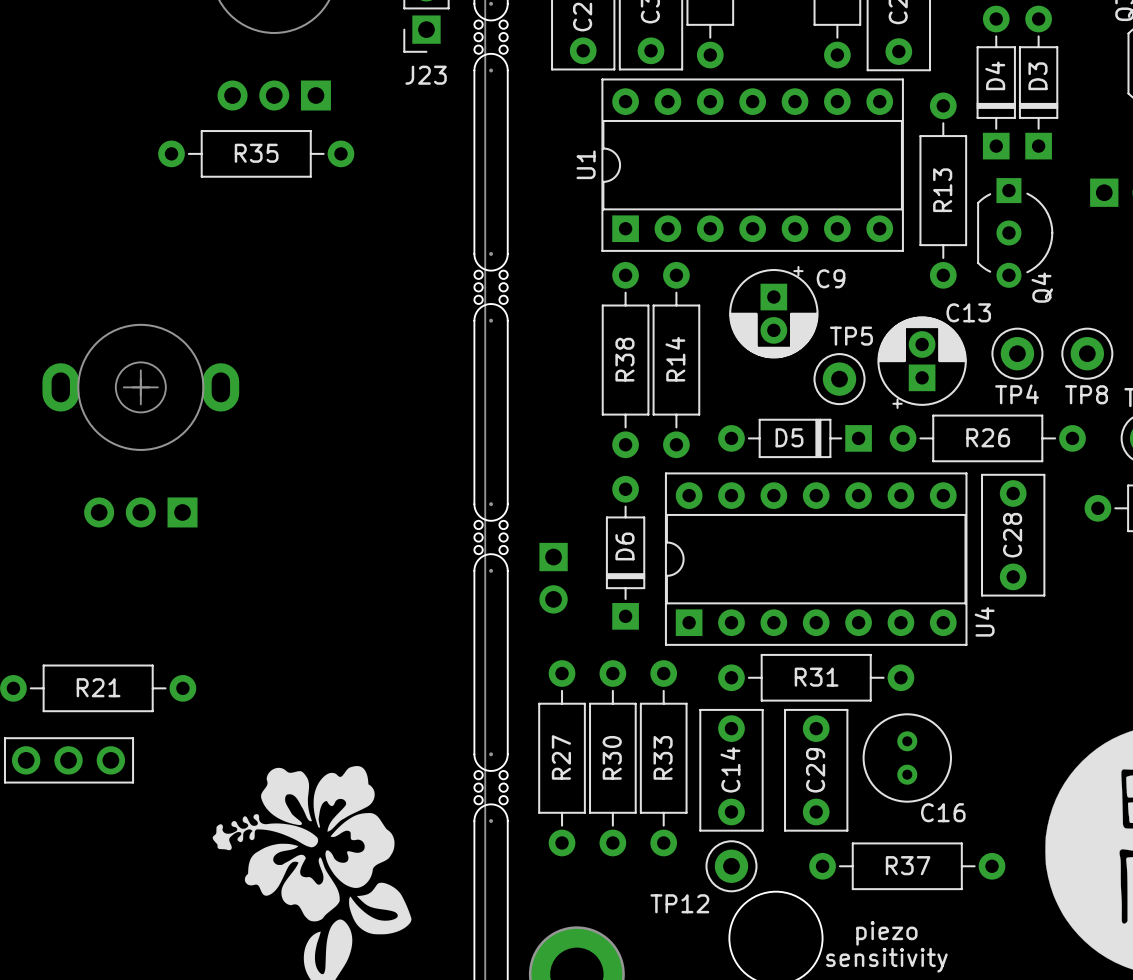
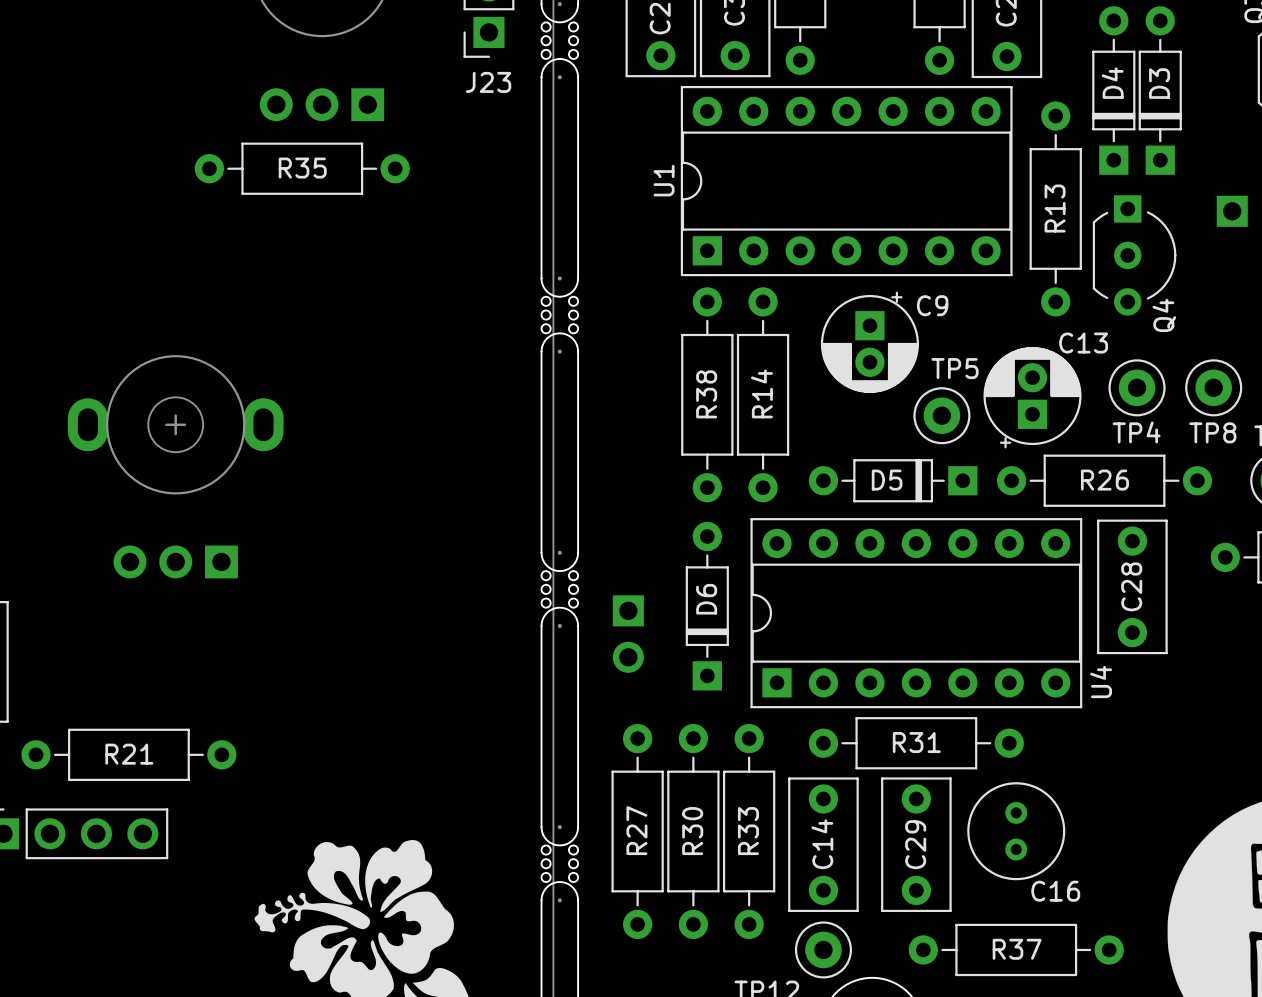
line: (140, 370) (140, 378) -> none
line: (123, 387) (132, 387) -> none
line: (149, 387) (157, 387) -> none
line: (140, 396) (140, 404) -> none

